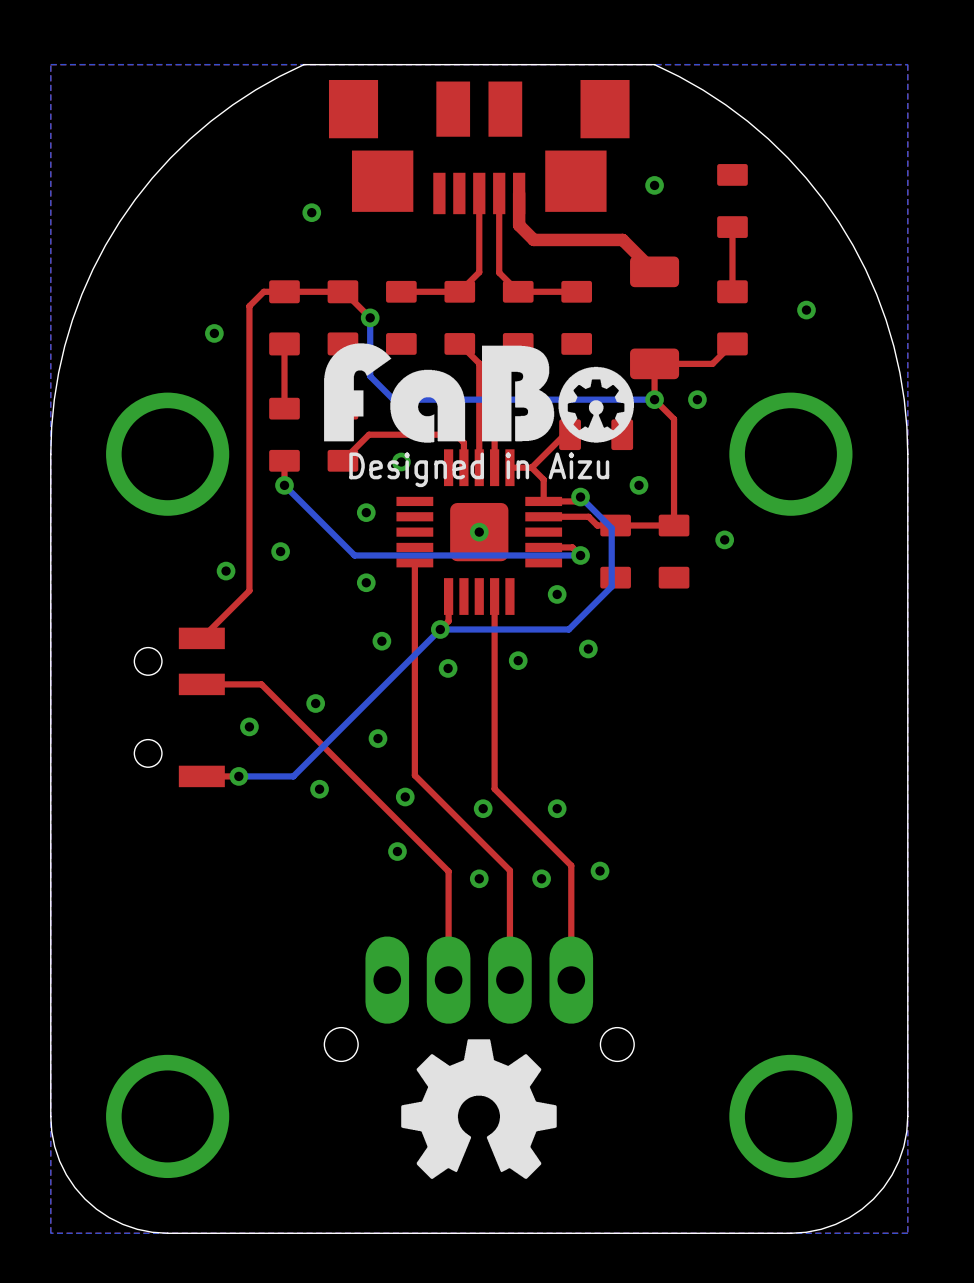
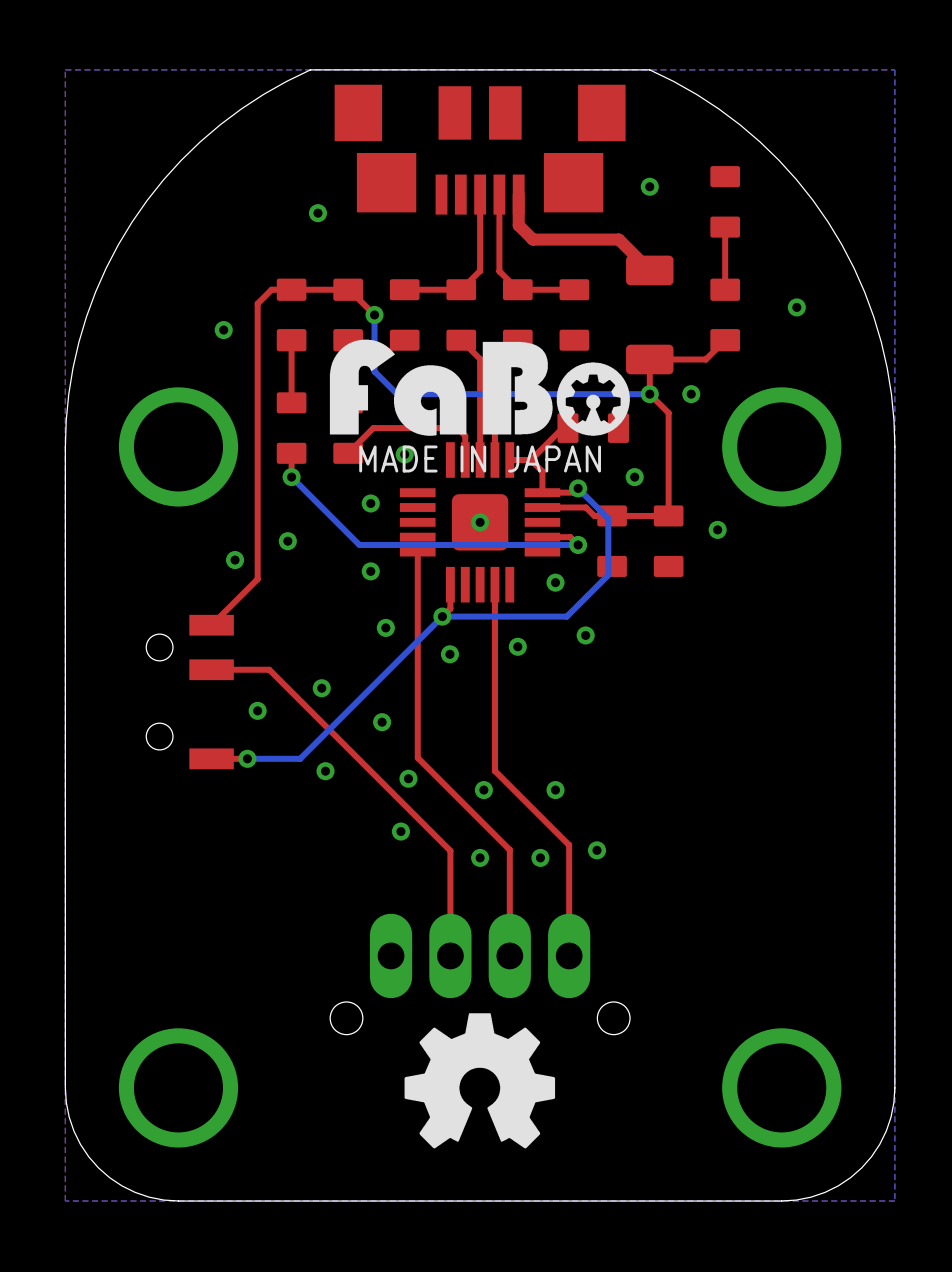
text: Designed in Aizu (479, 469) -> MADE IN JAPAN (480, 459)

